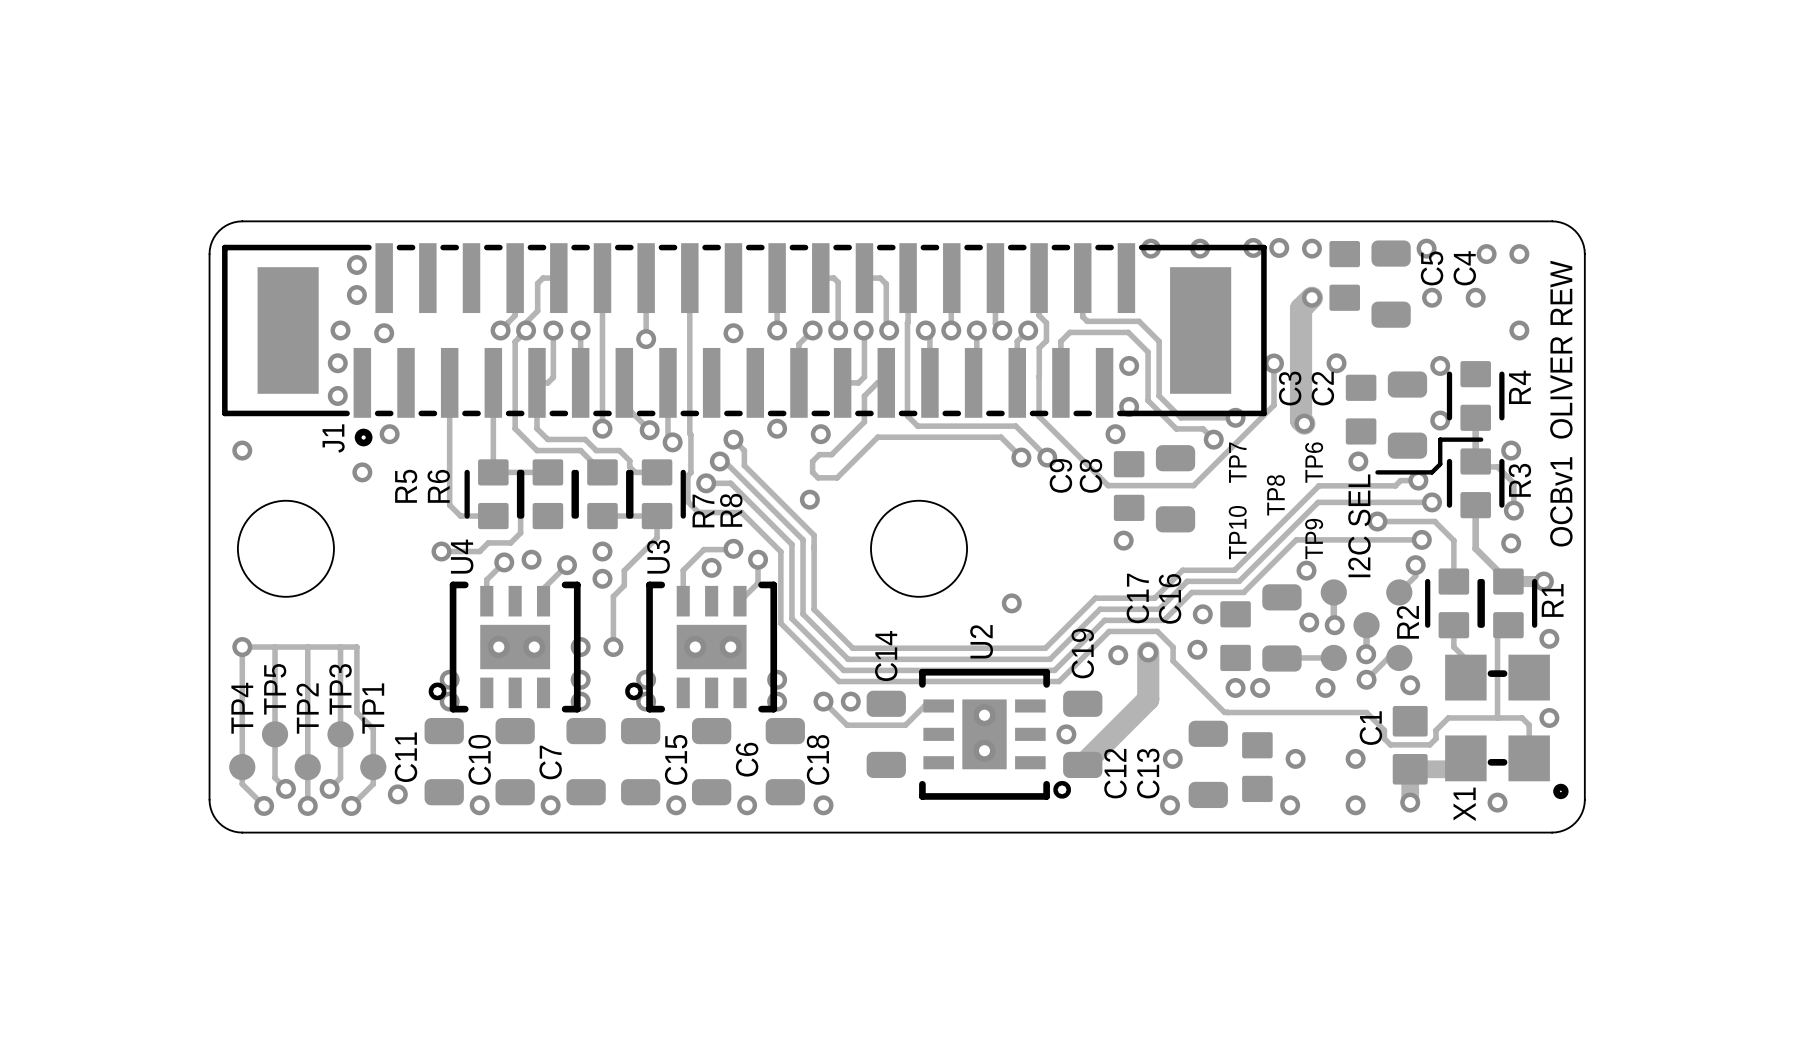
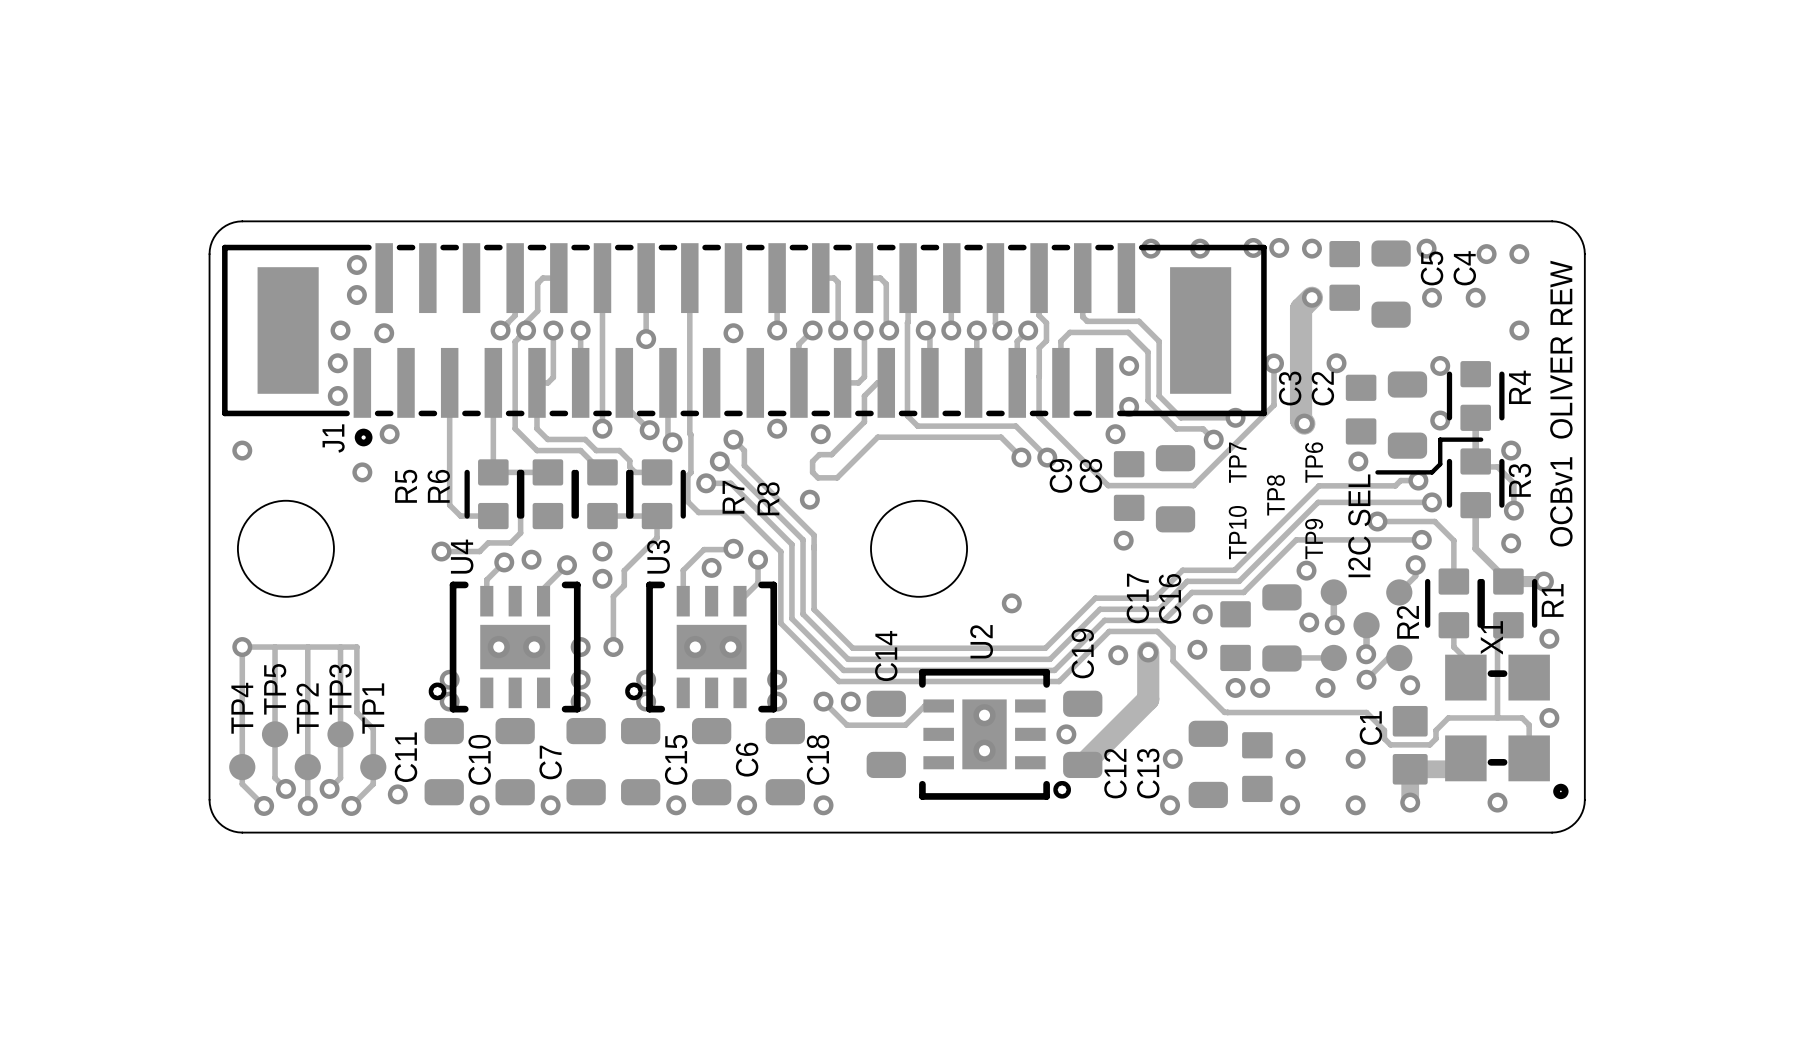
R7 name position: R7 (703, 510) -> R7 (733, 497)
R8 name position: R8 (731, 510) -> R8 (768, 498)
X1 name position: X1 (1464, 804) -> X1 (1491, 637)

